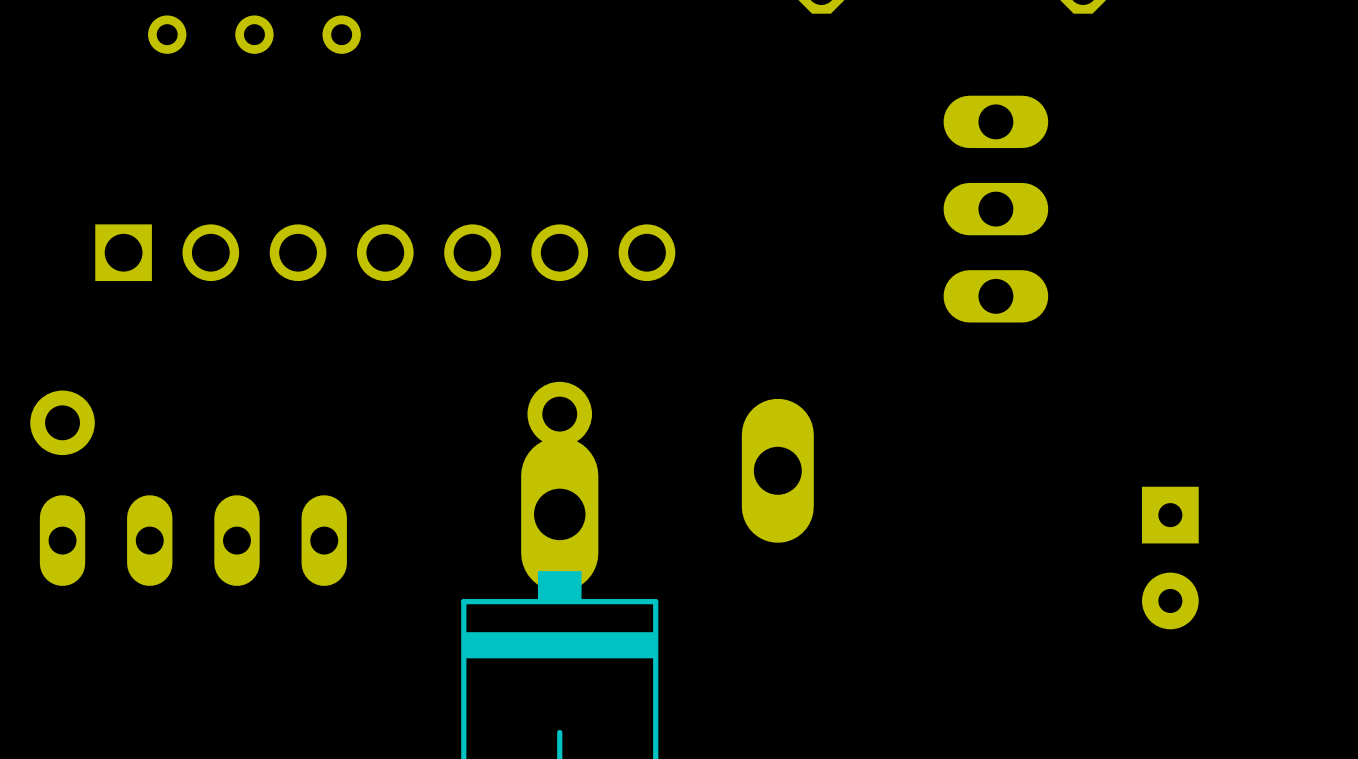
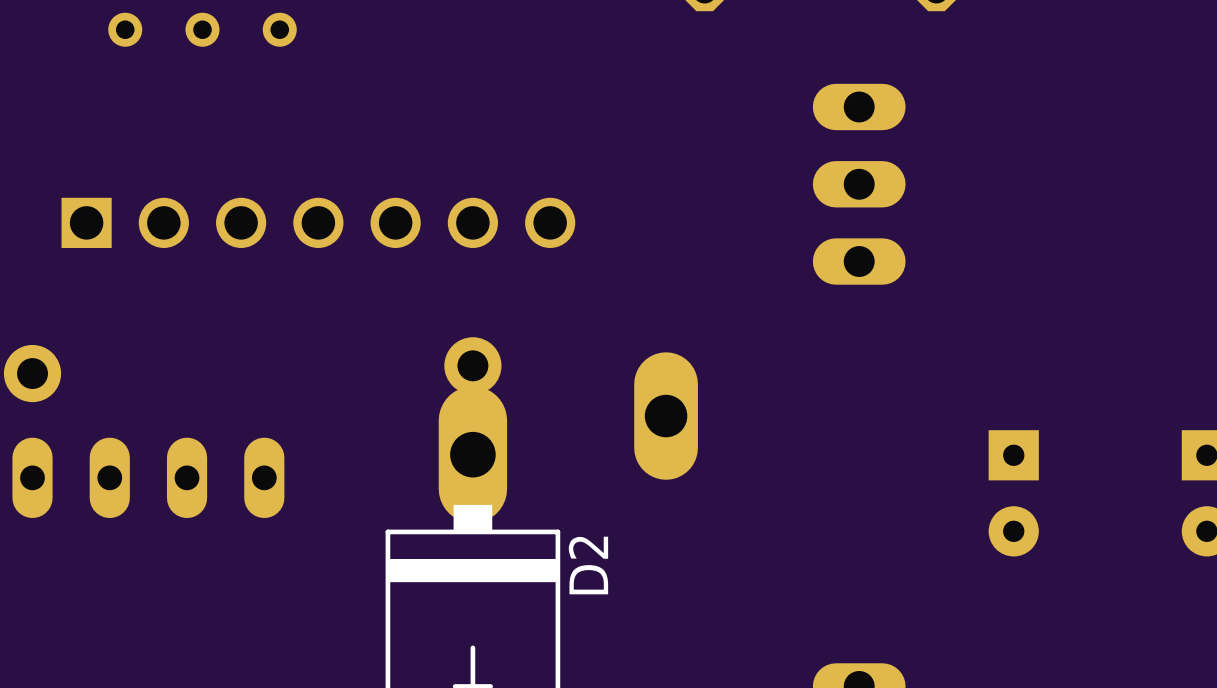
D2 name: none -> D2 (588, 565)

